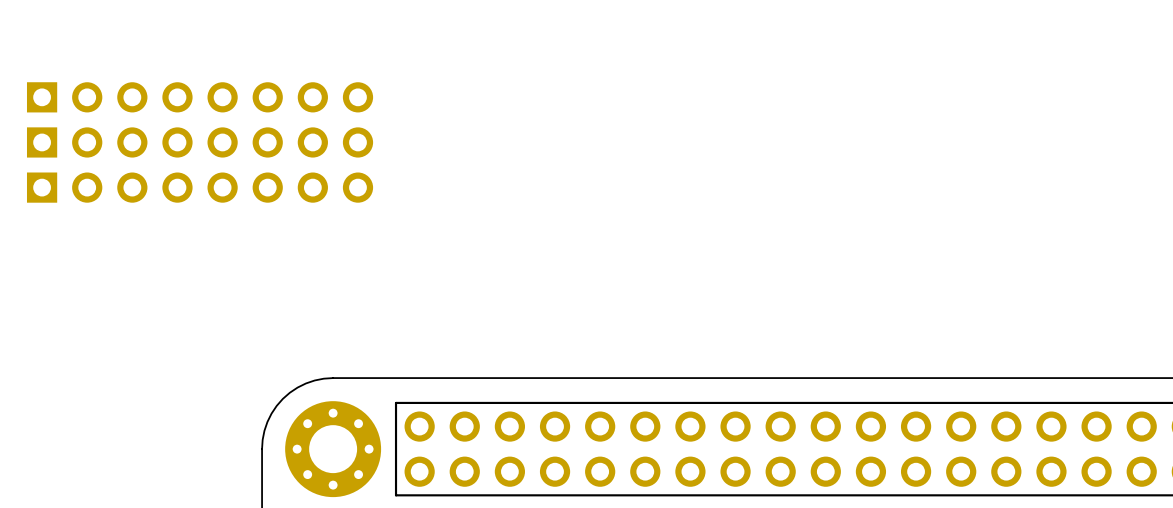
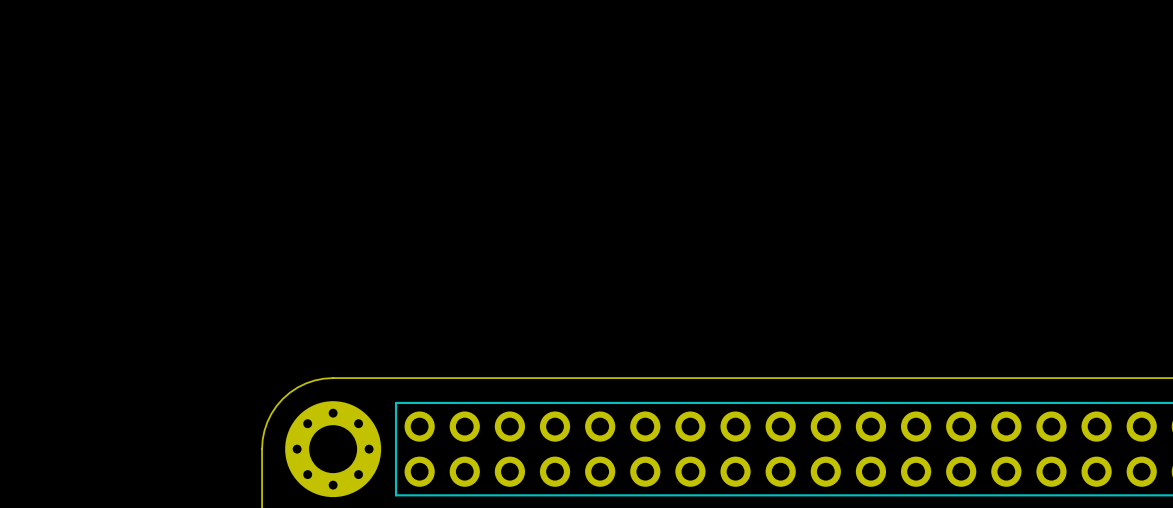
part: (200, 97) -> none
part: (200, 142) -> none
part: (200, 187) -> none

